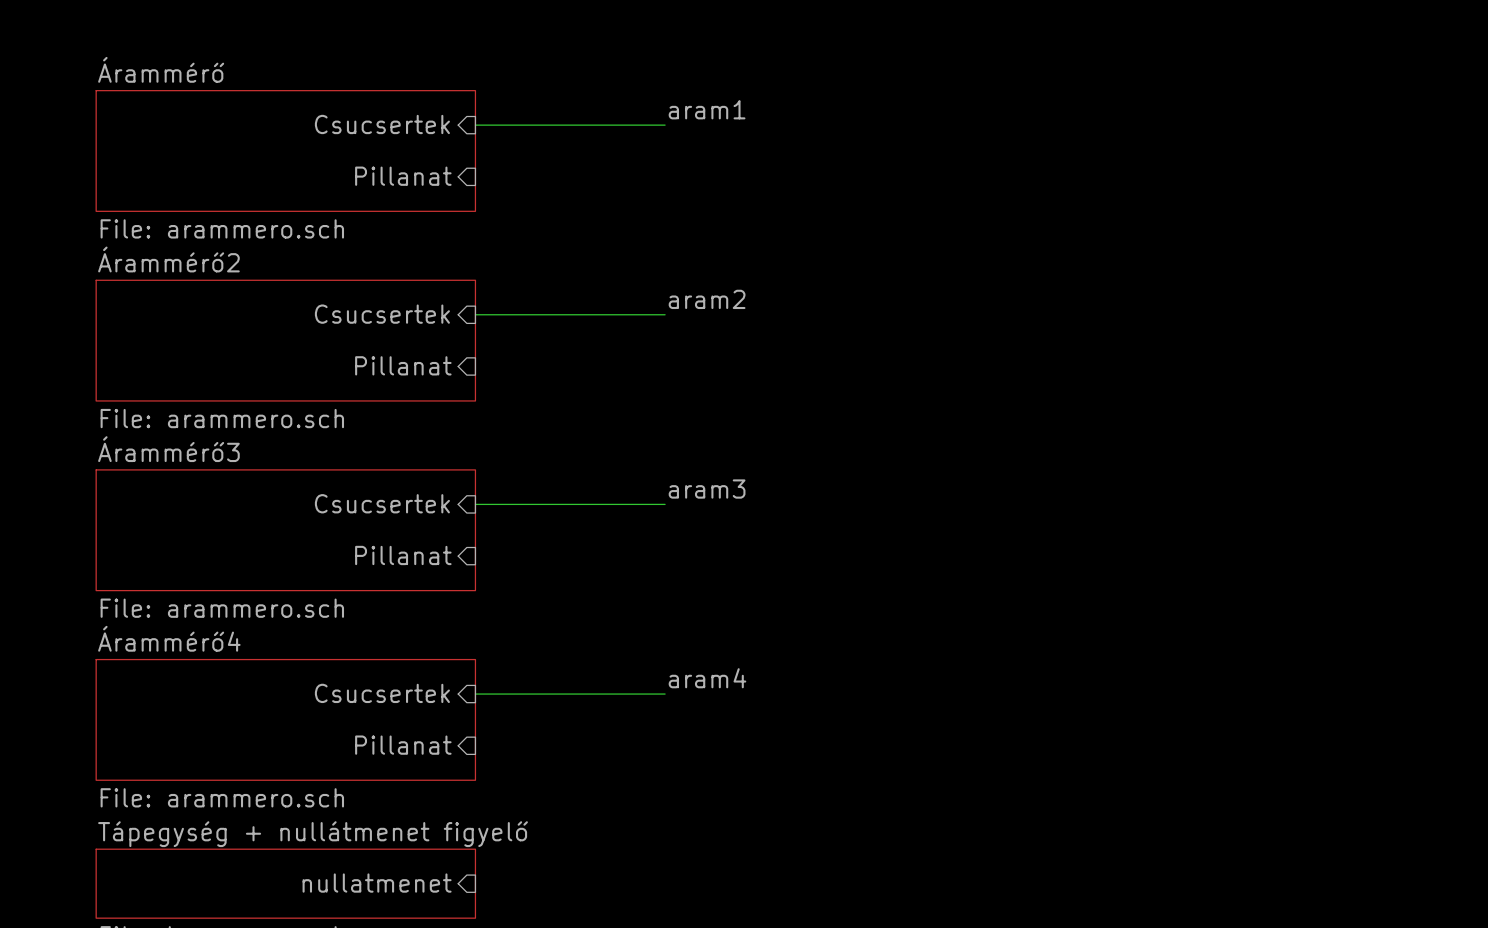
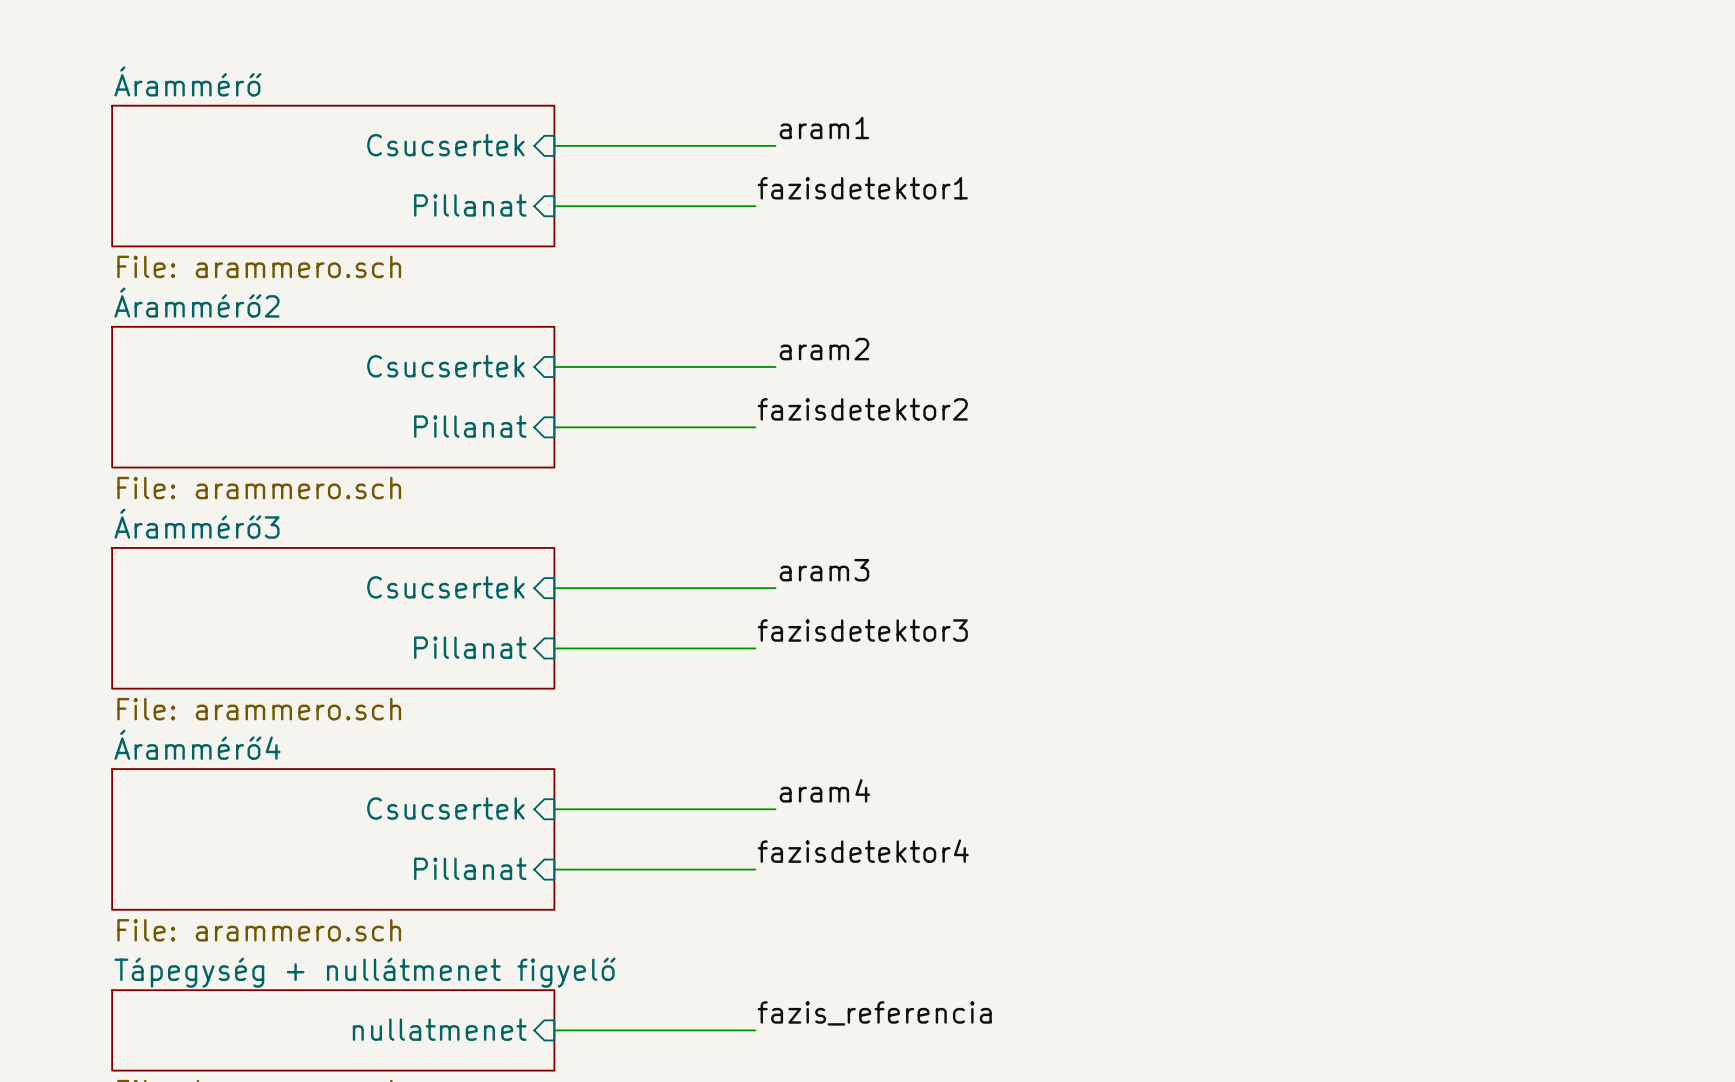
label: none -> fazisdetektor1 (862, 188)
wire: none -> (554, 206) (755, 206)
label: none -> fazisdetektor2 (862, 409)
wire: none -> (554, 427) (755, 427)
label: none -> fazisdetektor3 (862, 630)
wire: none -> (554, 648) (755, 648)
label: none -> fazisdetektor4 (863, 851)
wire: none -> (554, 869) (755, 869)
label: none -> fazis_referencia (874, 1013)
wire: none -> (554, 1030) (755, 1030)

